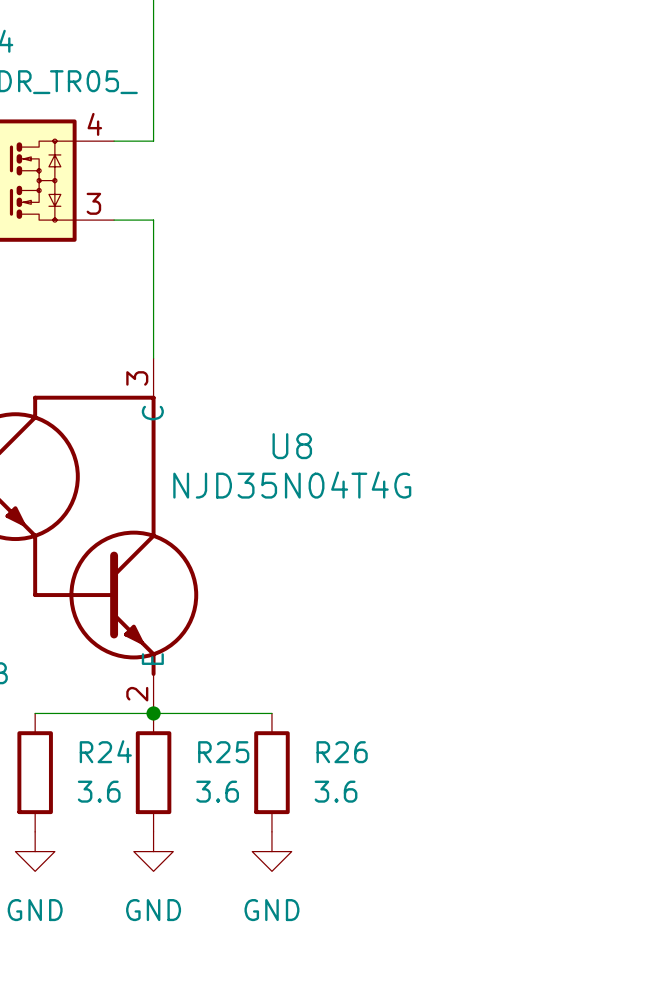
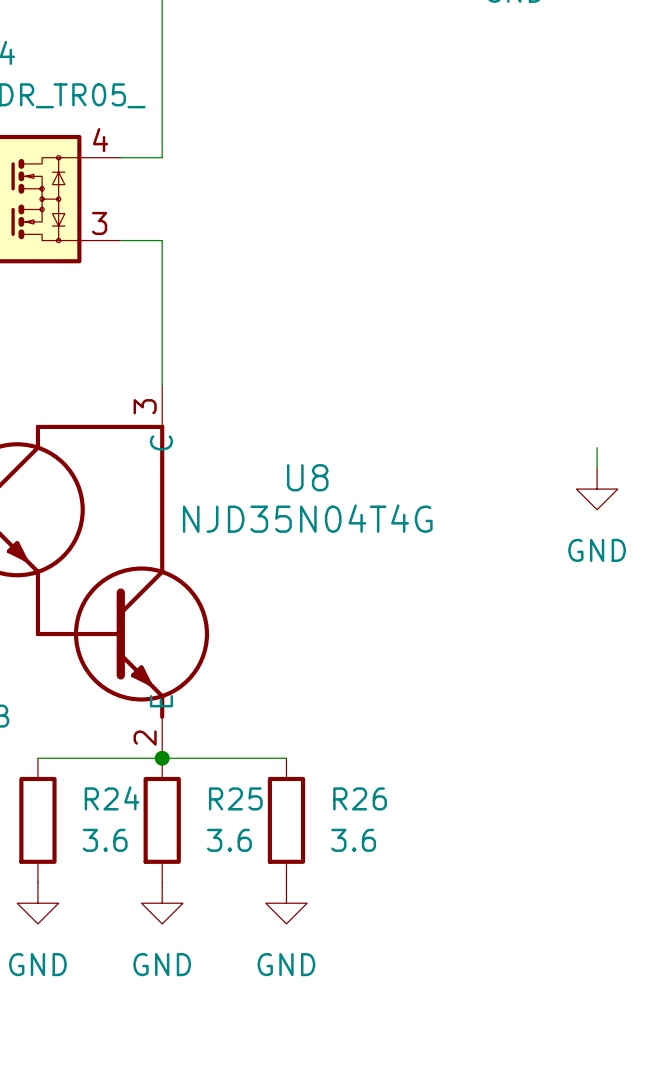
wire: none -> (597, 447) (597, 468)
power symbol: none -> GND (597, 489)

